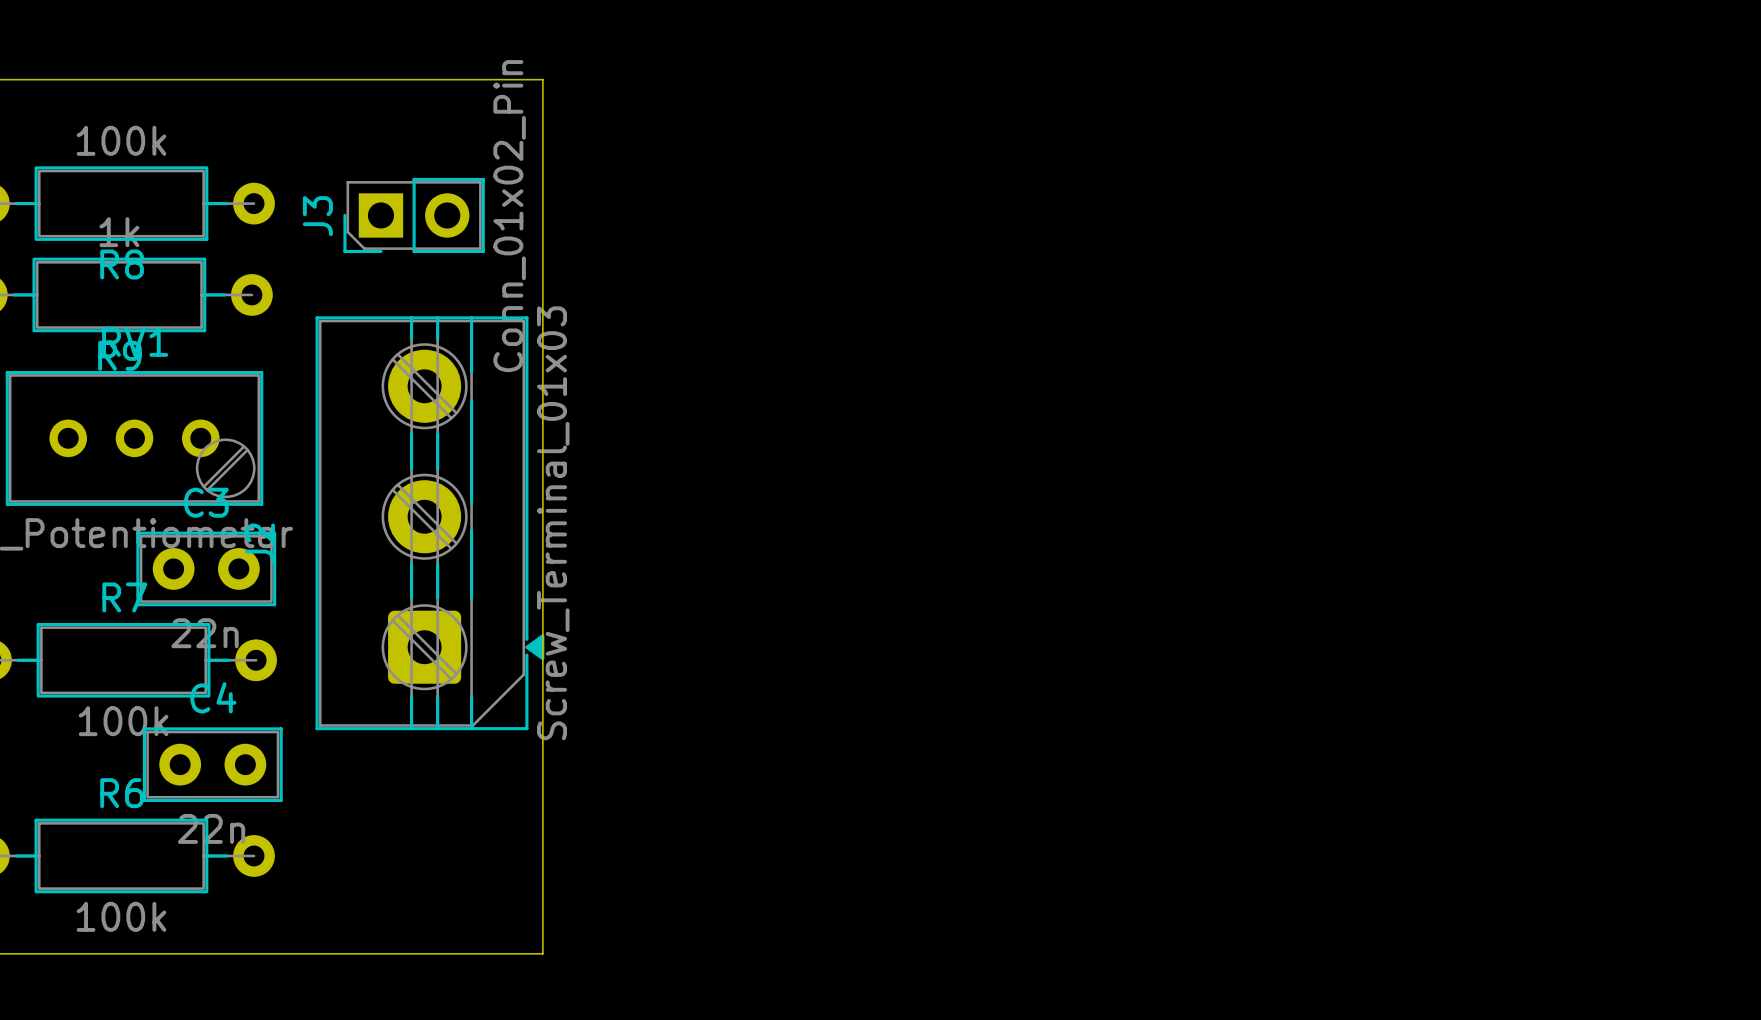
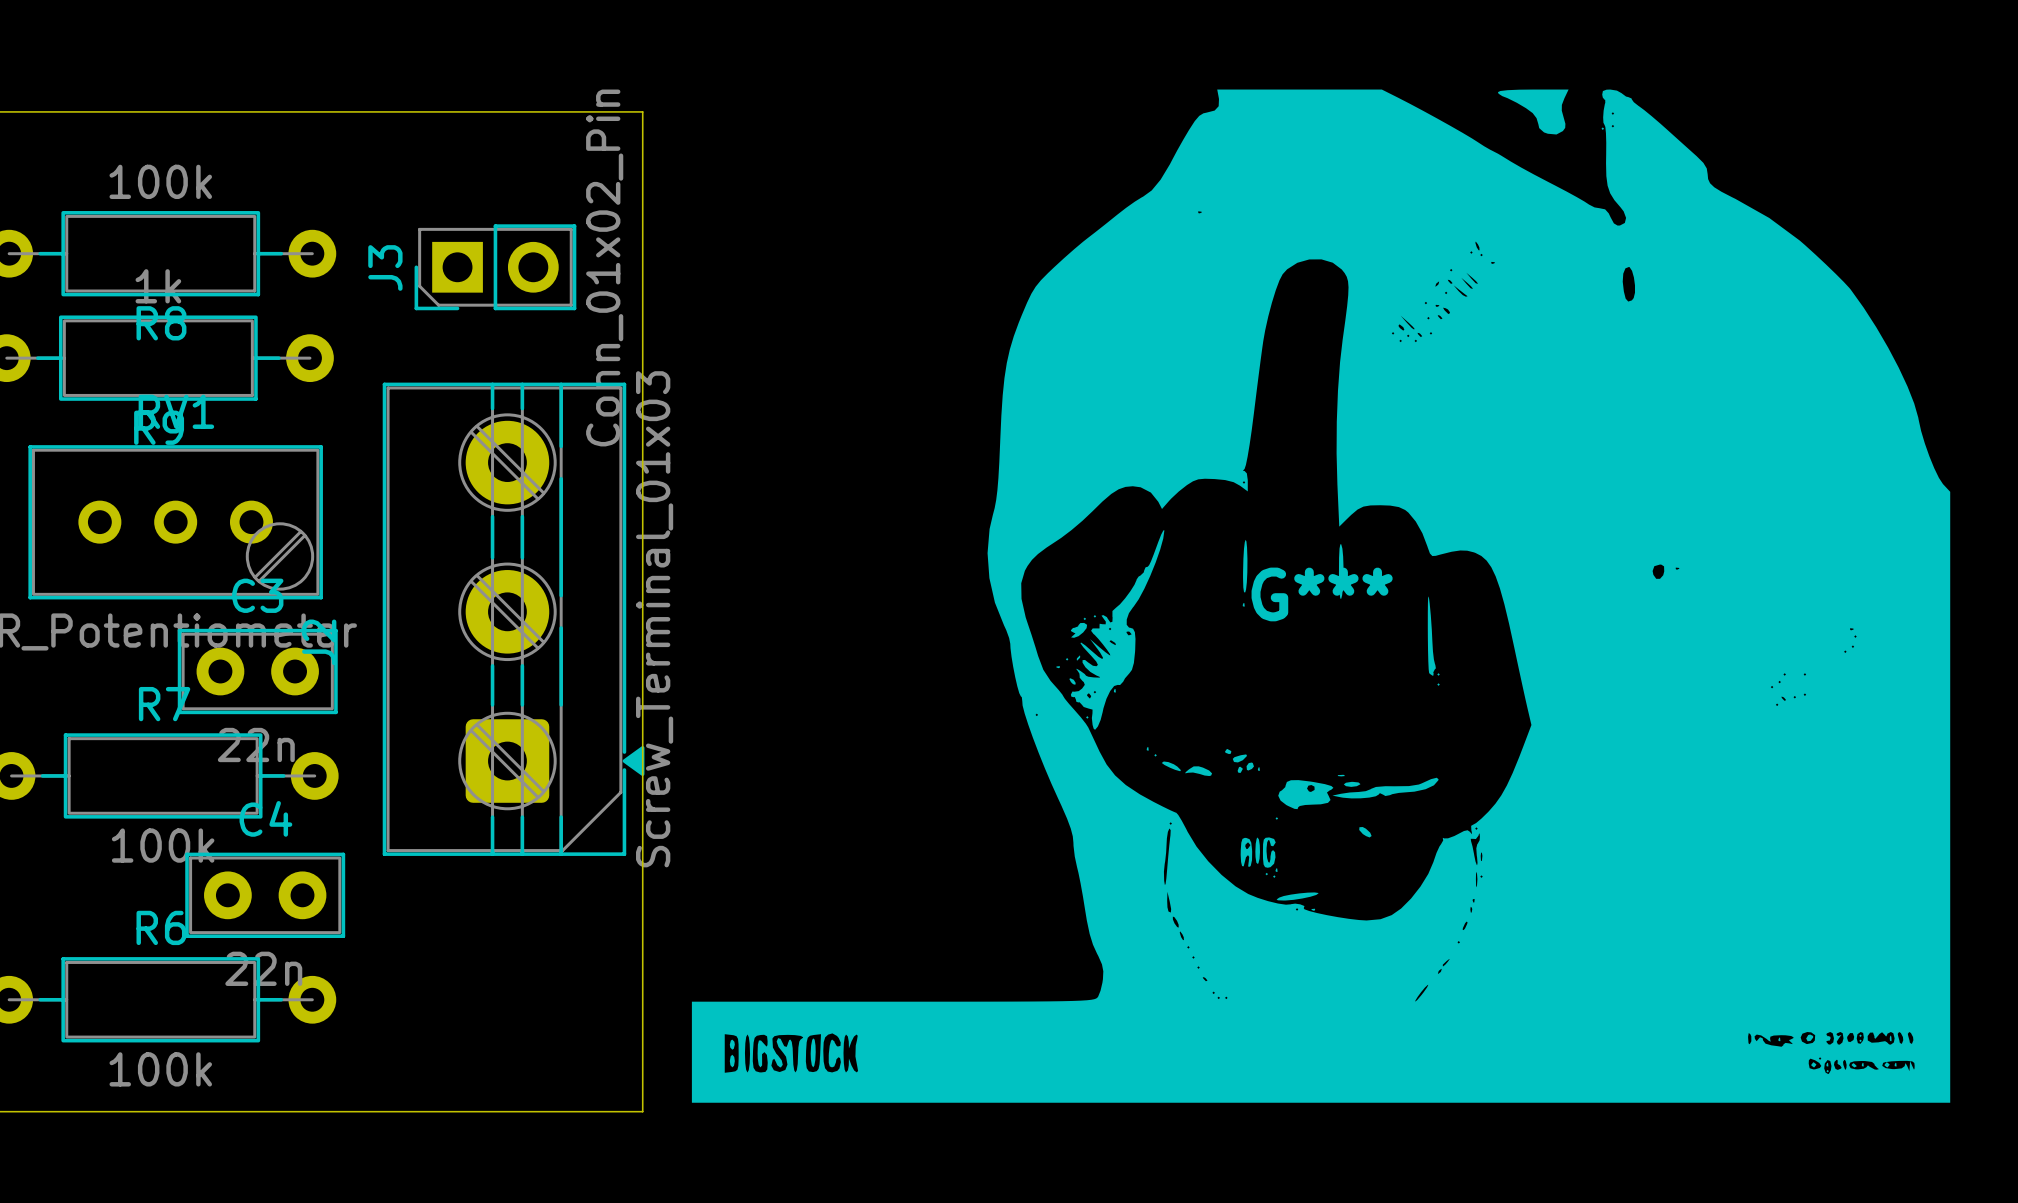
G***: none -> (1321, 596)

